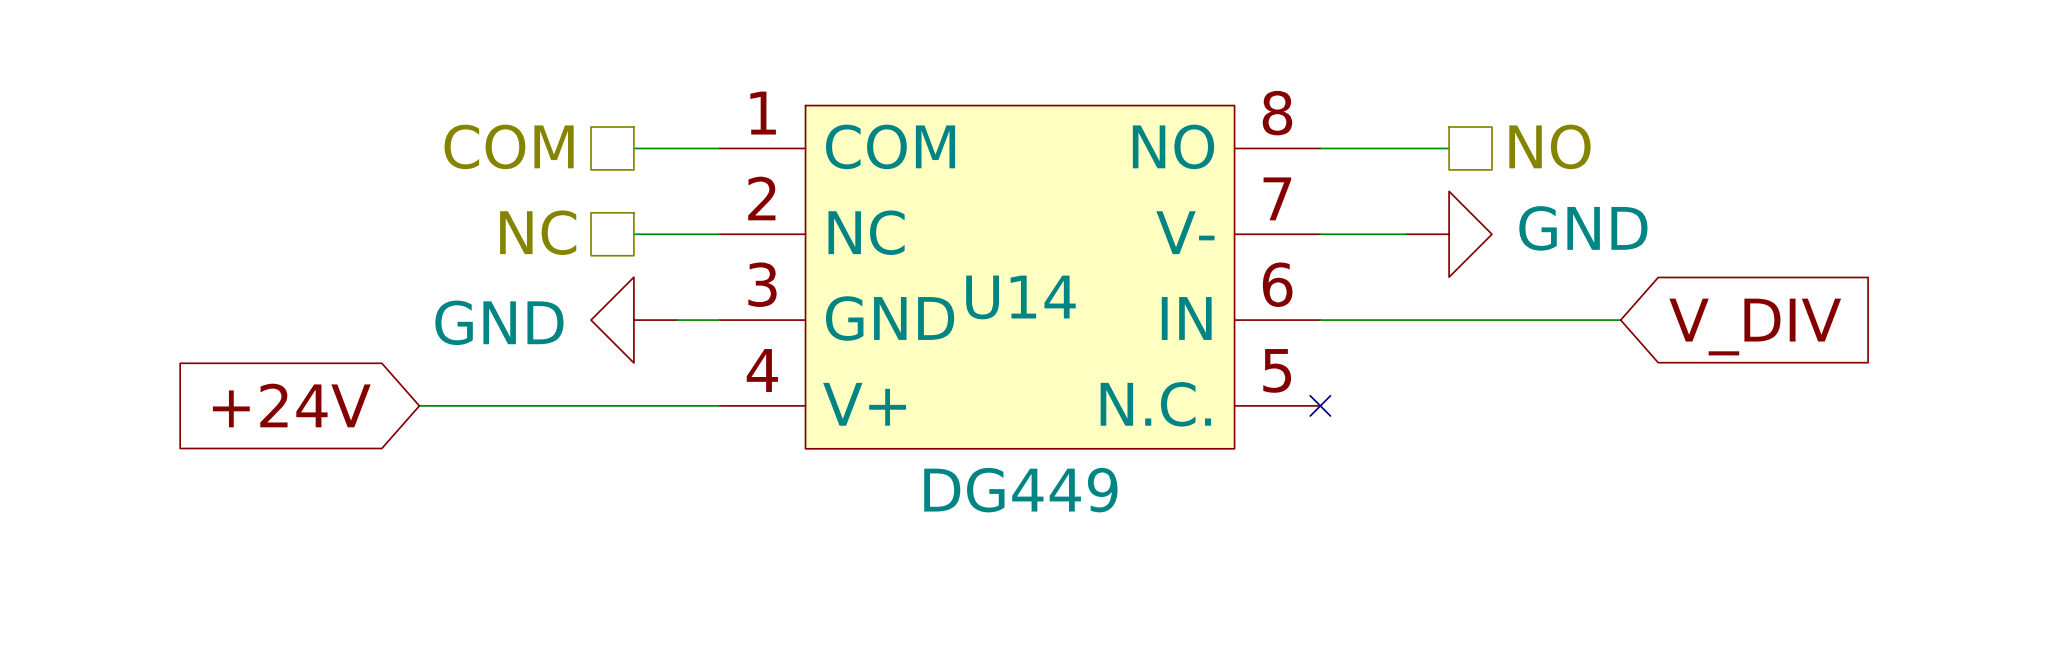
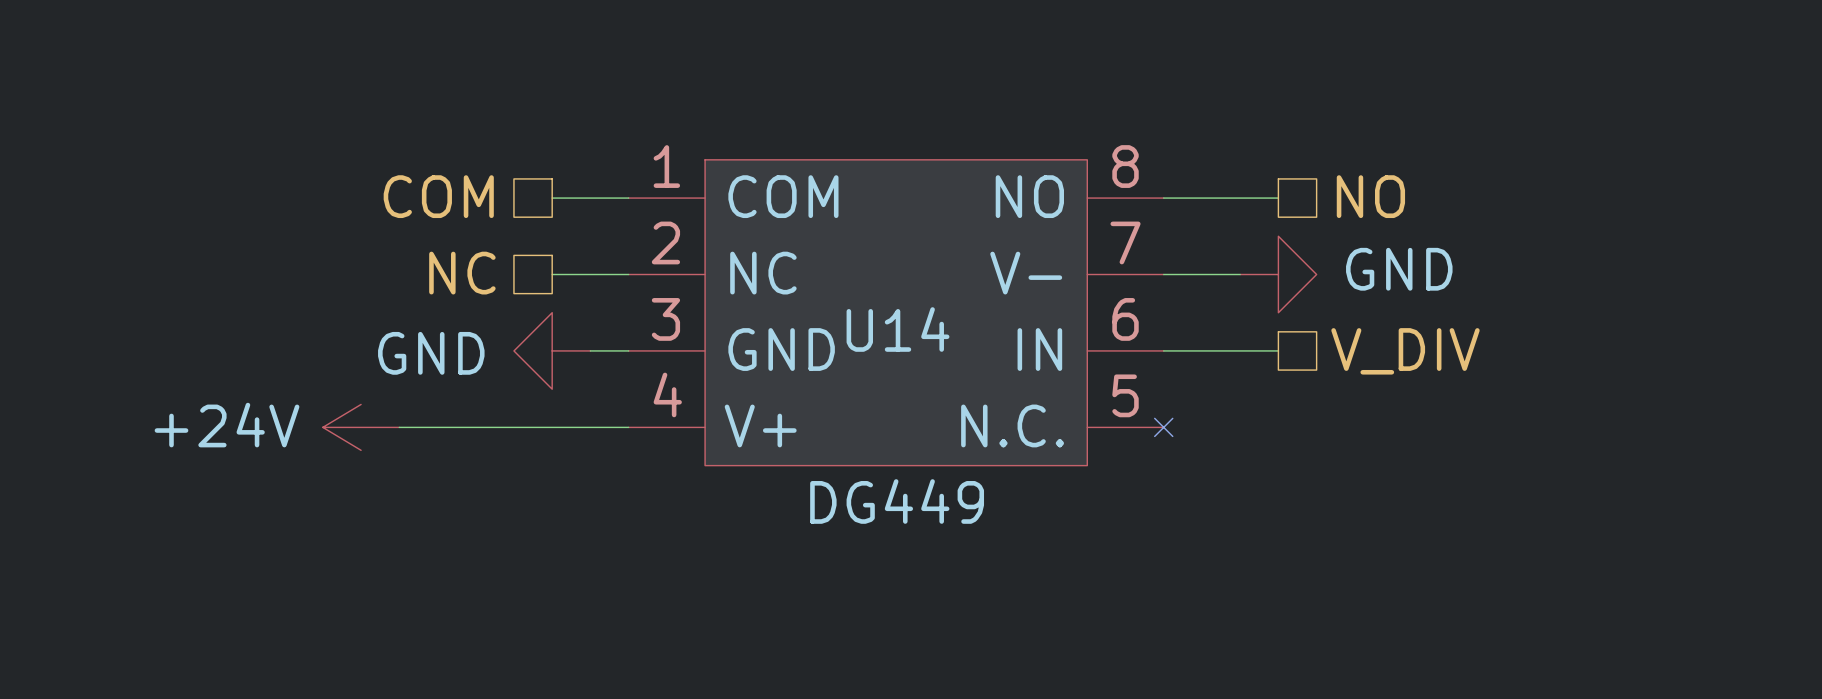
wire: (1449, 320) (1620, 320) -> none
hierarchical label: none -> V_DIV (1405, 351)
global label: V_DIV (1755, 327) -> none
global label: +24V (291, 405) -> none
power symbol: none -> +24V (361, 427)

